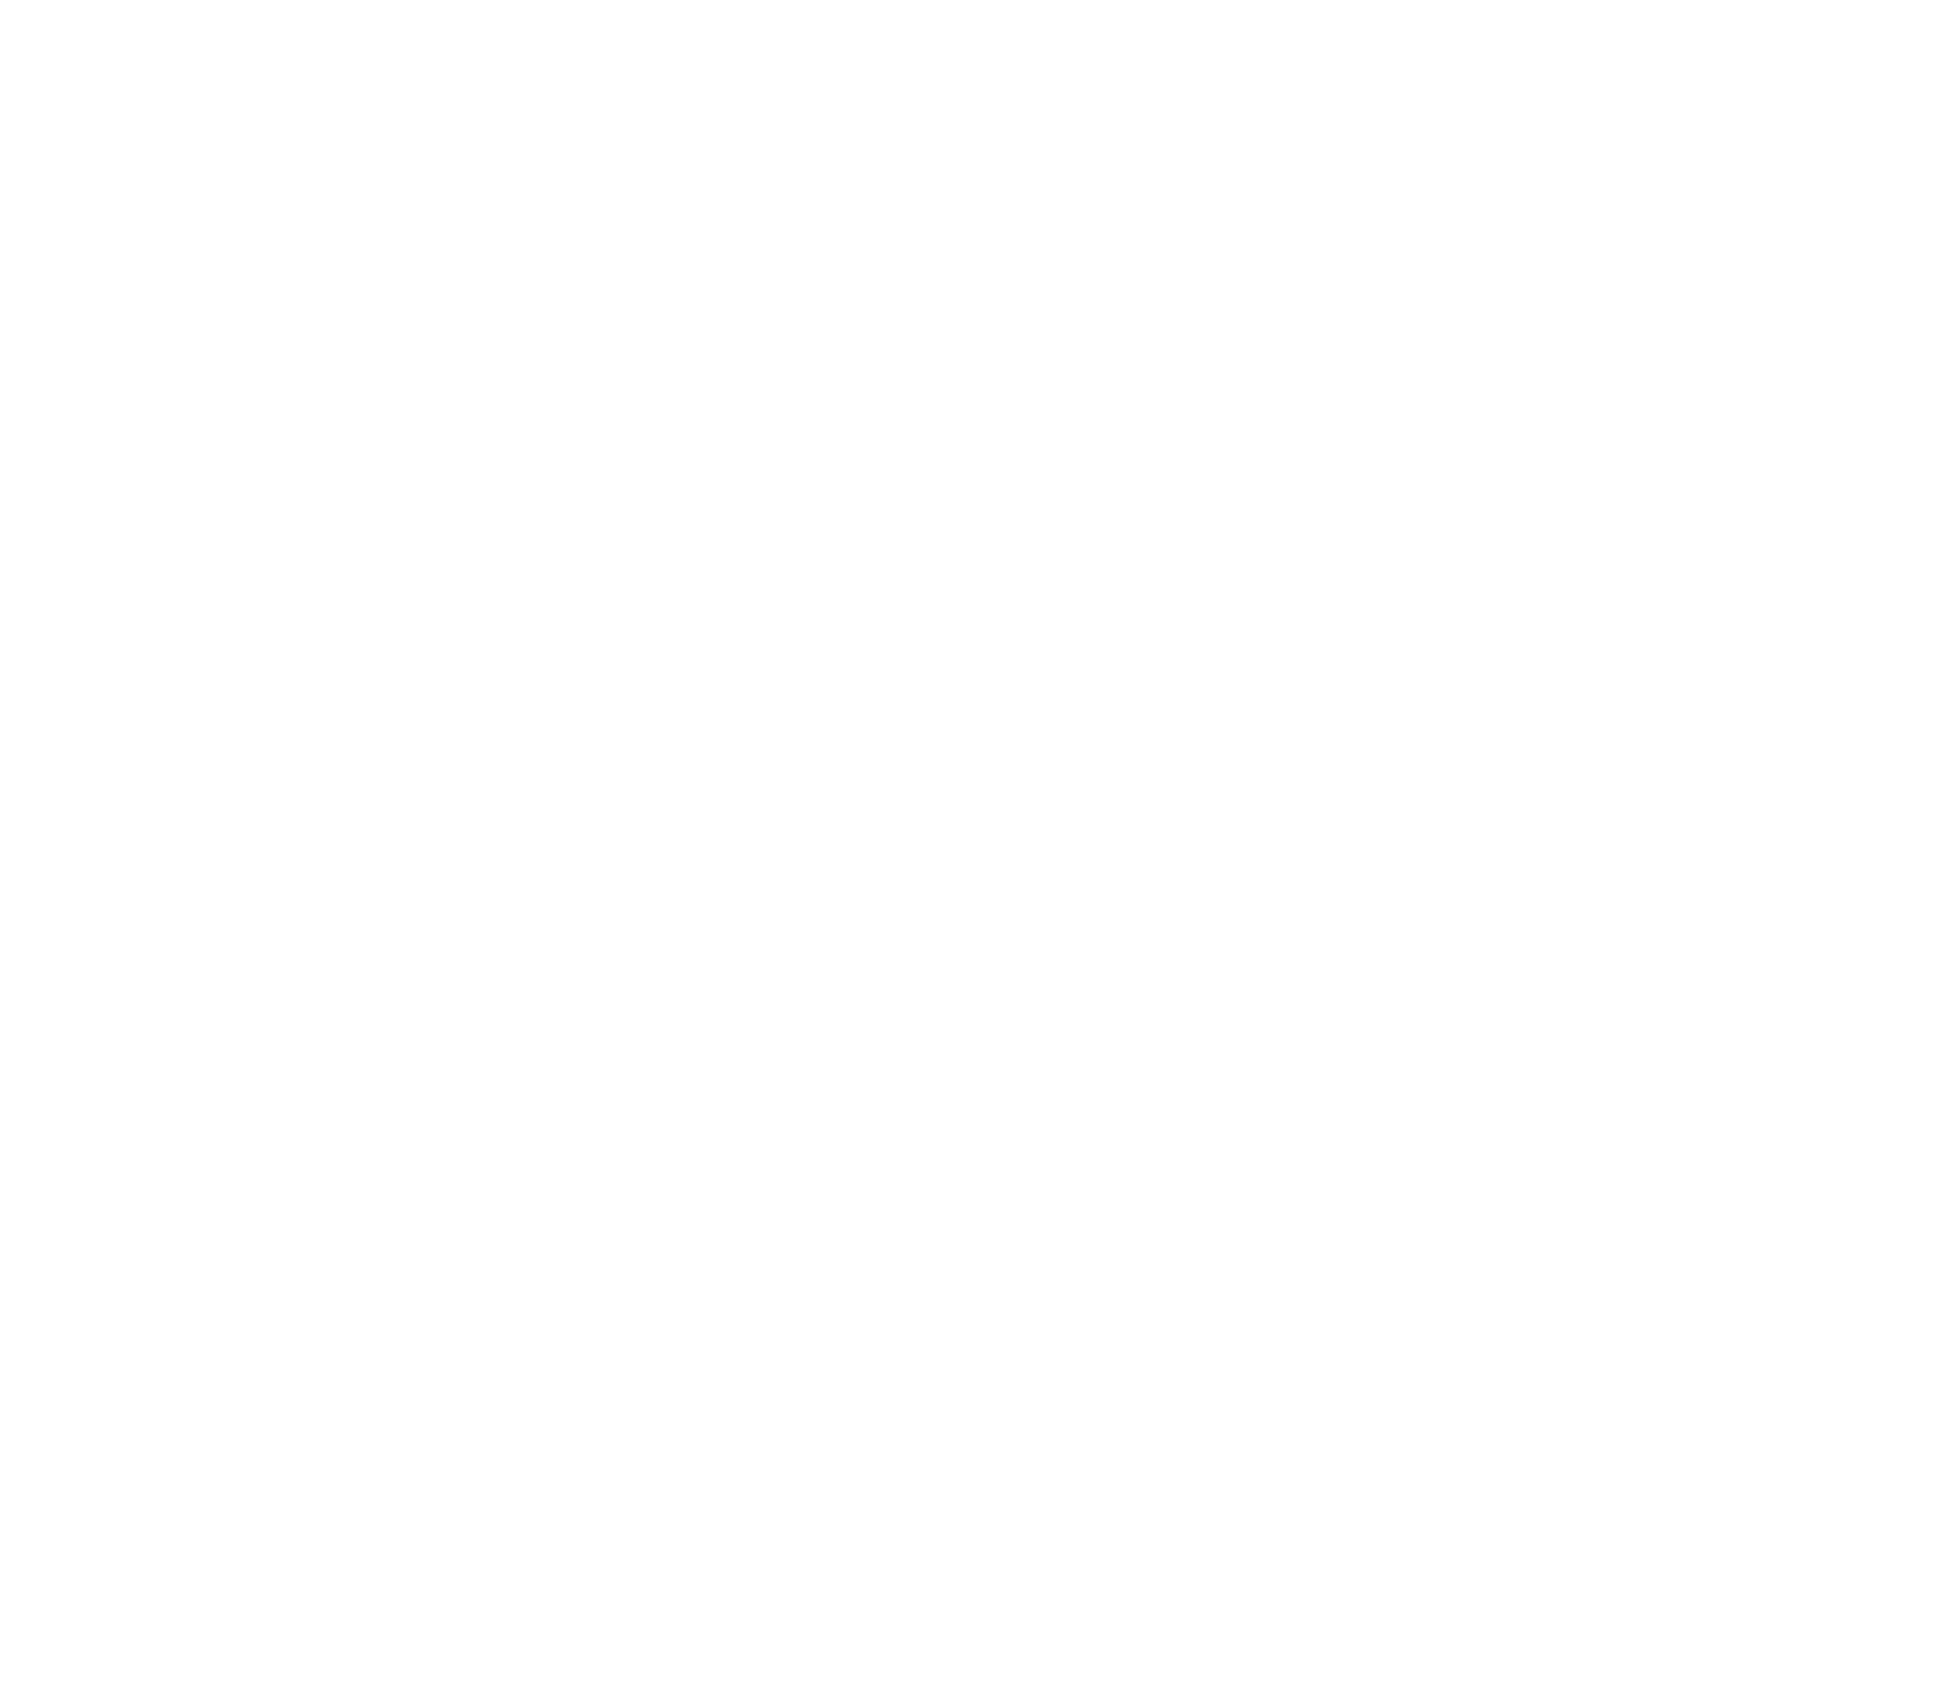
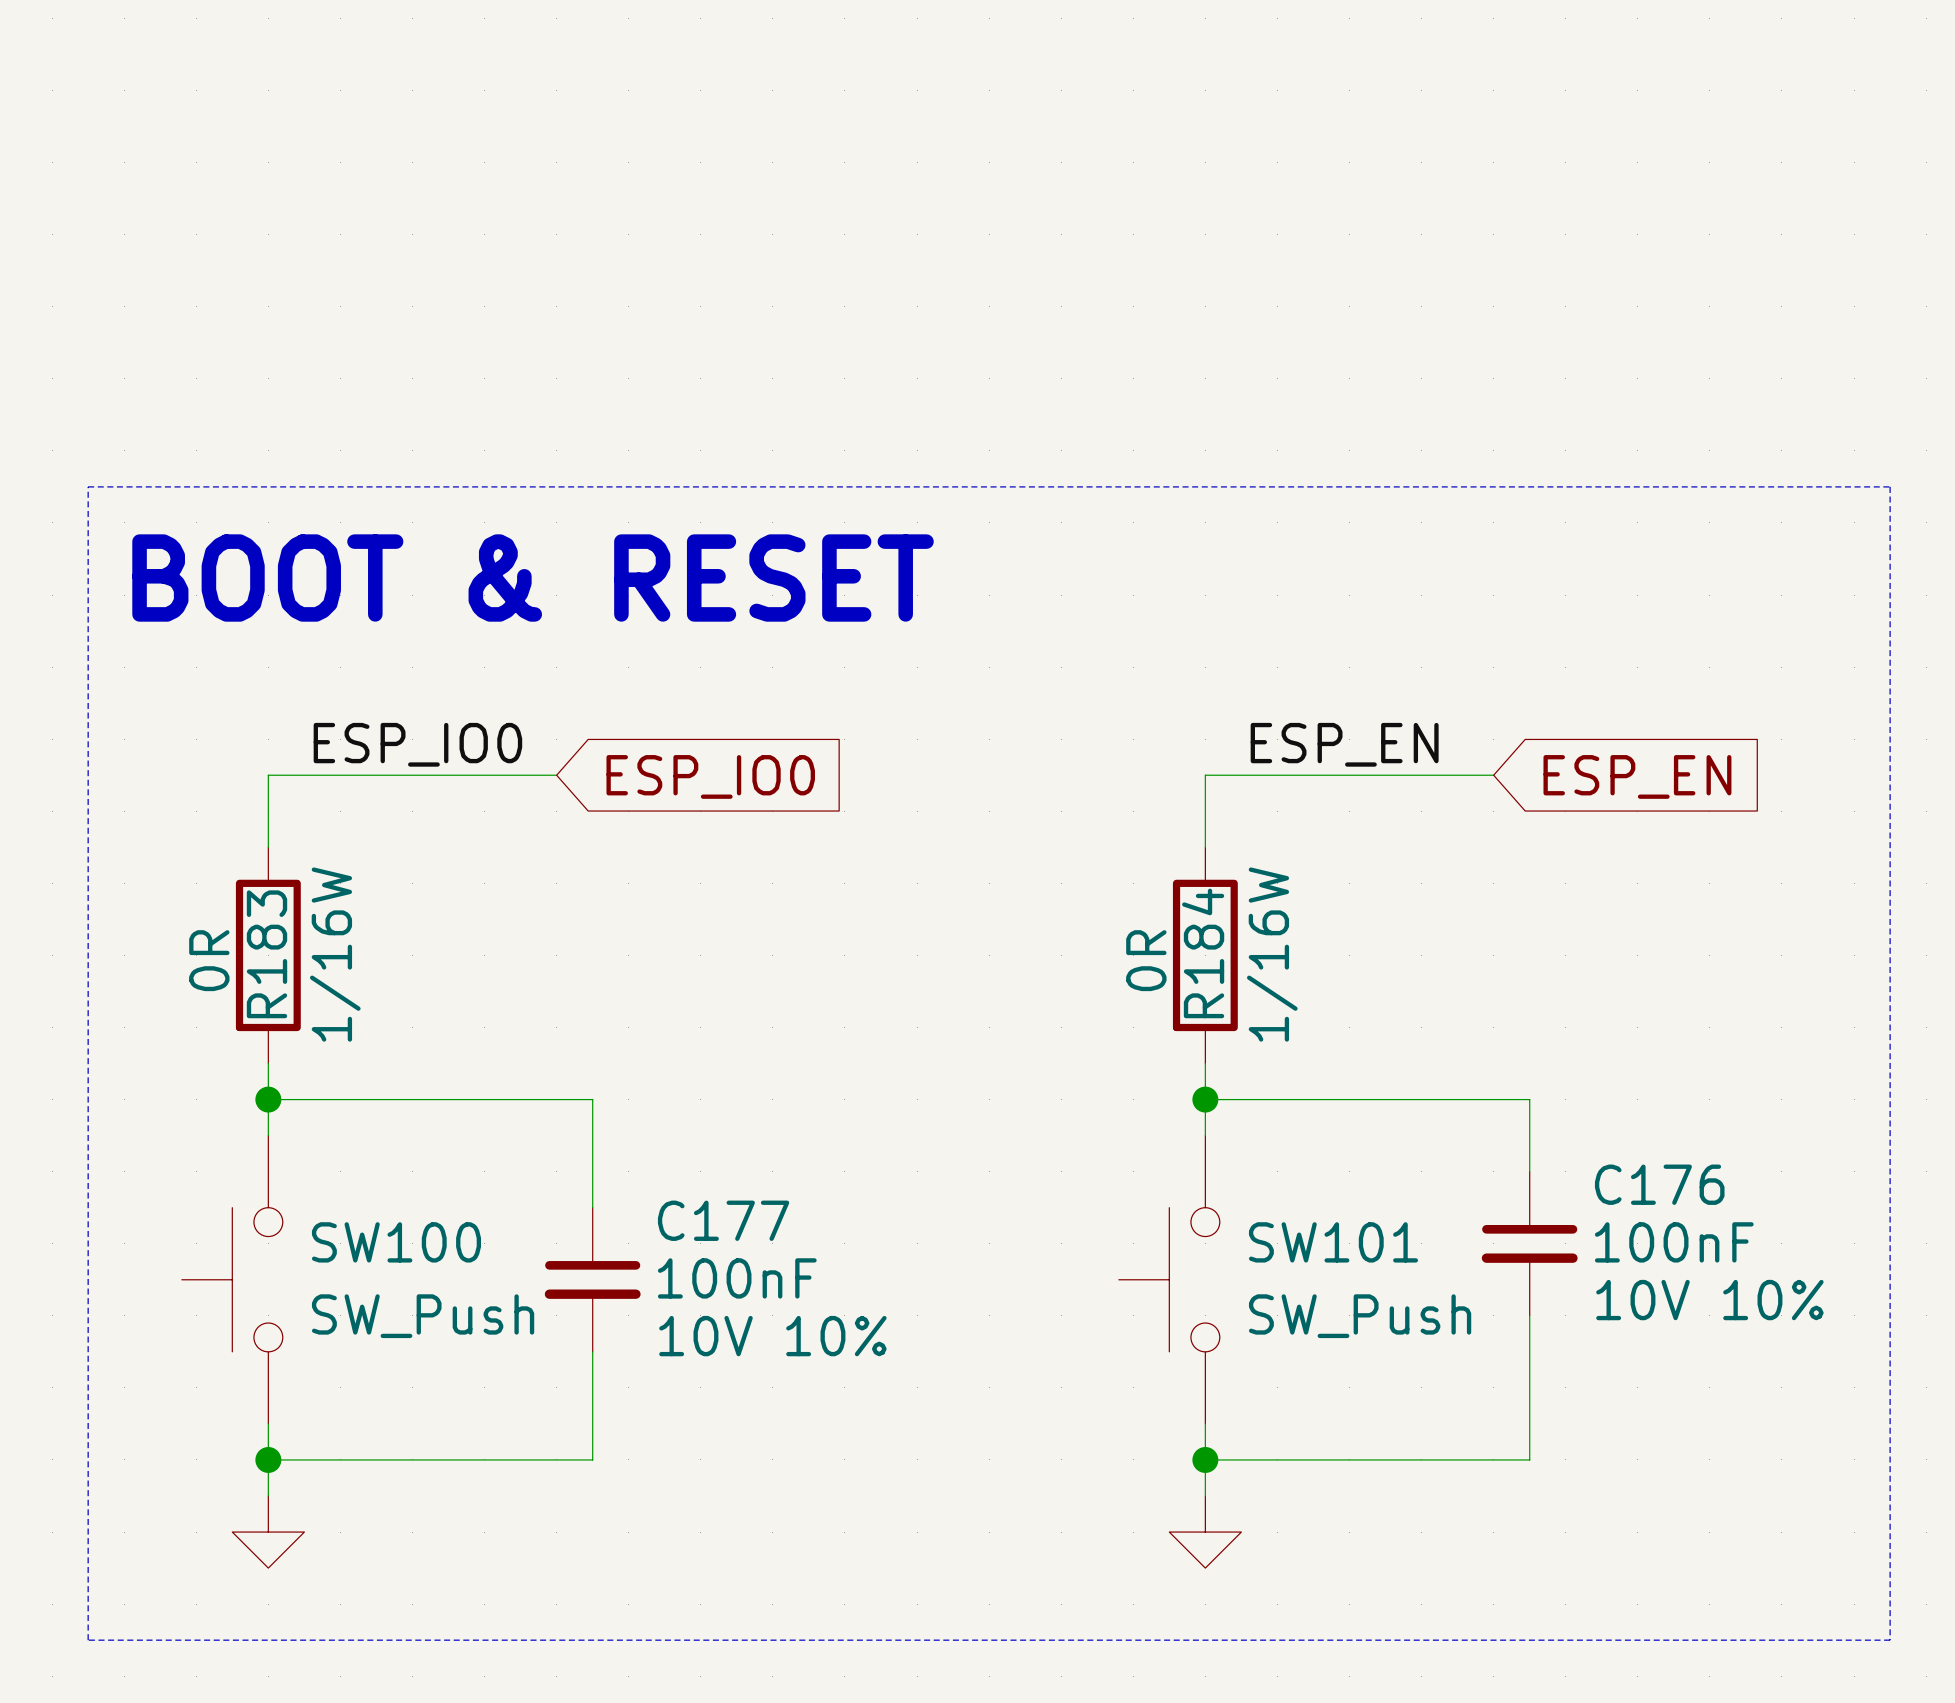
line: none -> (88, 486) (1890, 486) (1890, 1640) (88, 1640) (88, 486)
text: none -> BOOT & RESET (533, 578)
label: none -> ESP_IO0 (417, 744)
label: none -> ESP_EN (1344, 744)
wire: none -> (556, 775) (268, 775) (268, 847)
wire: none -> (1493, 775) (1205, 775) (1205, 847)
global label: none -> ESP_IO0 (710, 776)
global label: none -> ESP_EN (1637, 776)
R183: none -> 0R (268, 955)
R184: none -> 0R (1205, 955)
wire: none -> (268, 1063) (268, 1135)
wire: none -> (1205, 1063) (1205, 1135)
wire: none -> (268, 1099) (592, 1099) (592, 1207)
junction: none -> (268, 1099)
wire: none -> (1205, 1099) (1529, 1099) (1529, 1171)
junction: none -> (1205, 1099)
C176: none -> 100nF (1529, 1243)
SW100: none -> SW_Push (232, 1279)
C177: none -> 100nF (592, 1279)
SW101: none -> SW_Push (1169, 1279)
wire: none -> (1529, 1315) (1529, 1459) (1205, 1459)
wire: none -> (592, 1351) (592, 1459) (268, 1459)
wire: none -> (268, 1423) (268, 1496)
wire: none -> (1205, 1423) (1205, 1496)
junction: none -> (268, 1459)
junction: none -> (1205, 1459)
power symbol: none -> (268, 1532)
power symbol: none -> (1205, 1532)

